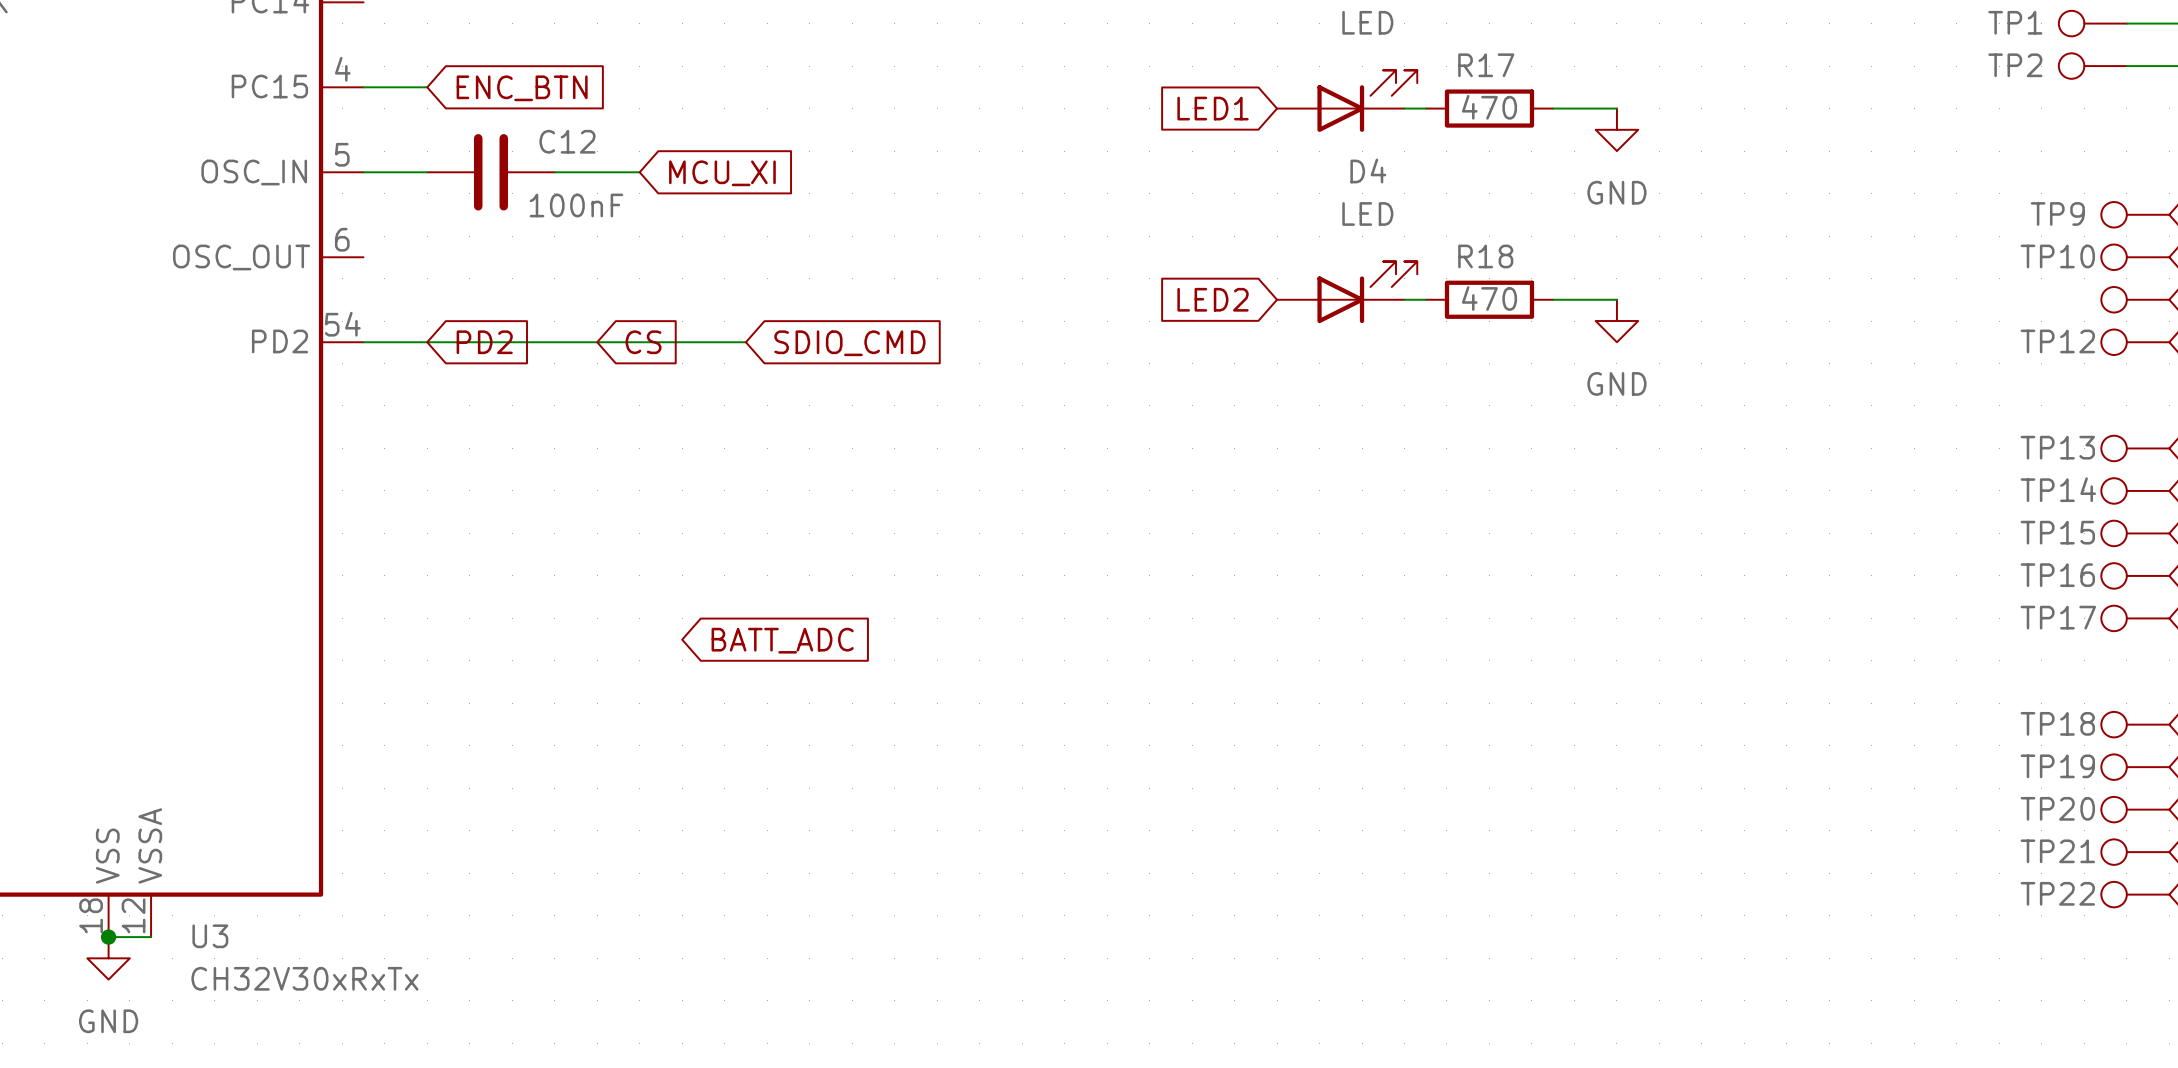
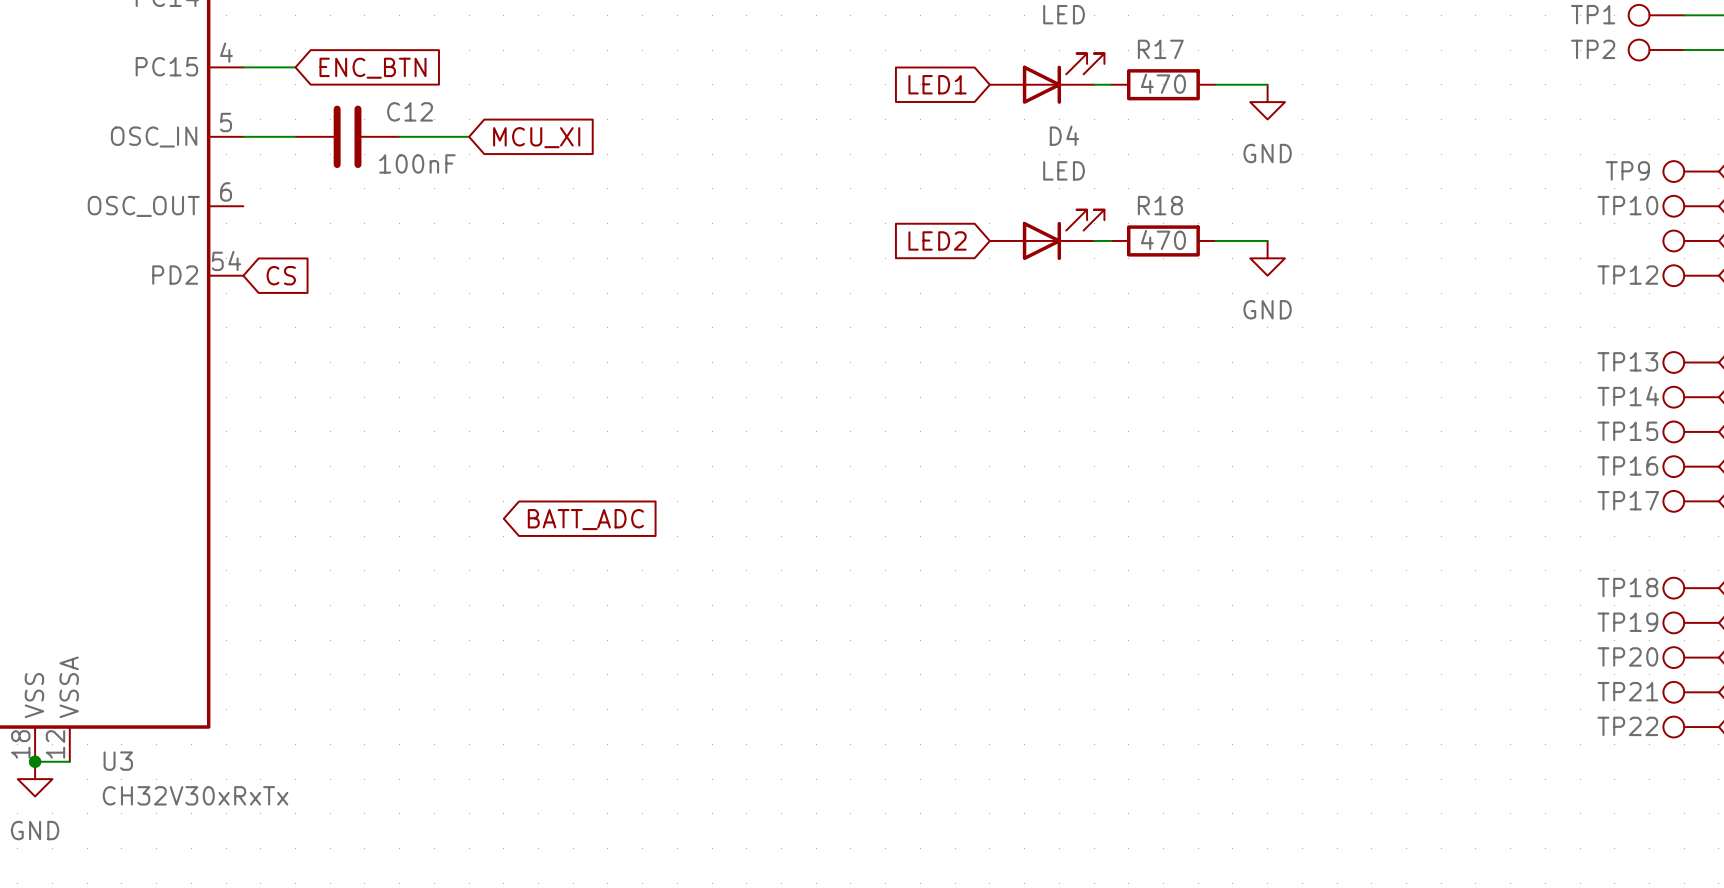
wire: (363, 342) (745, 342) -> none
global label: PD2 (484, 342) -> none
global label position: CS (643, 342) -> CS (281, 275)
global label: SDIO_CMD (849, 343) -> none

